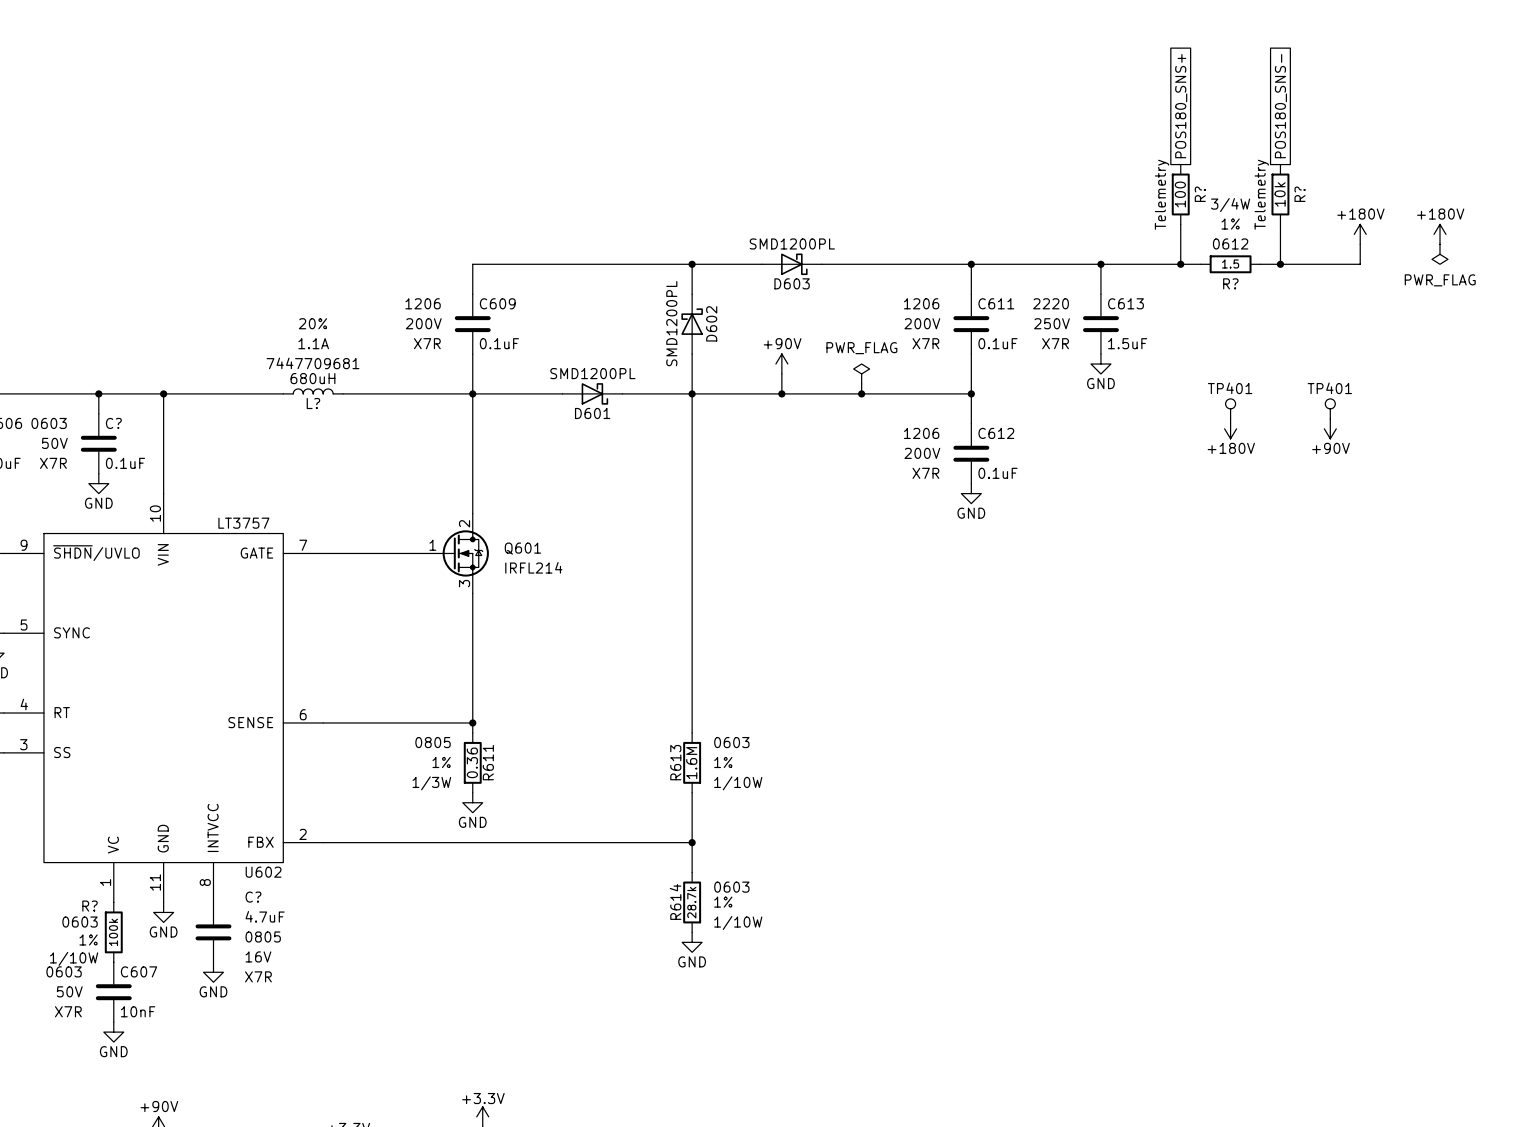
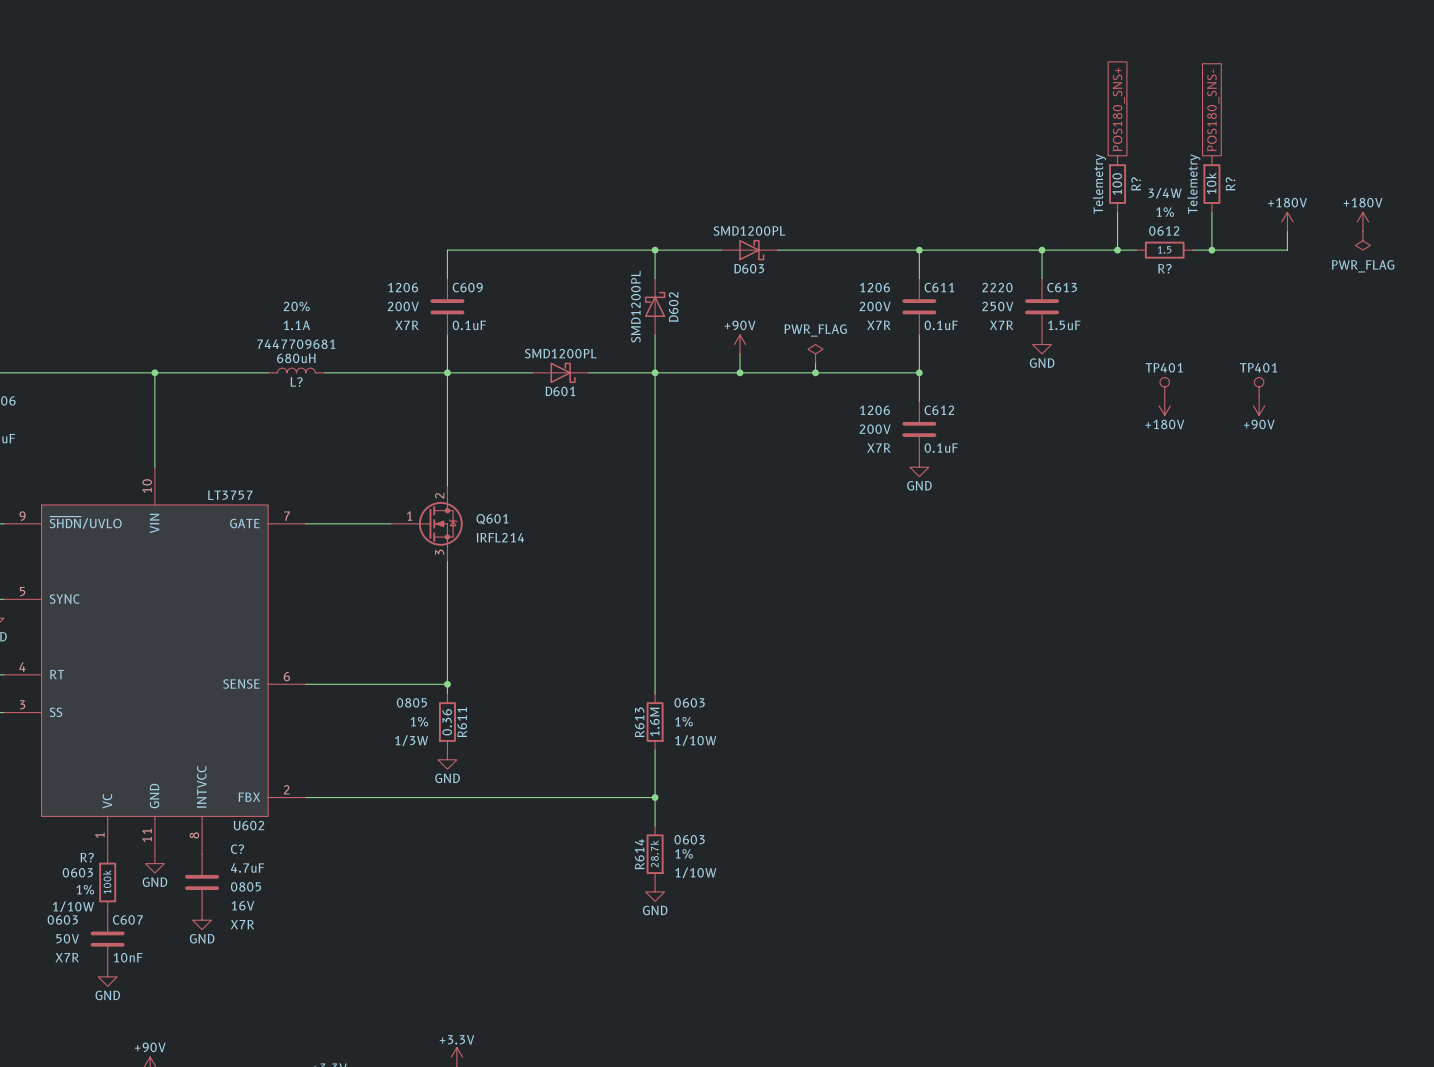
wire: (98, 393) (98, 413) -> none
junction: (98, 393) -> none
C?: 0.1uF (98, 443) -> none
power symbol: GND (98, 483) -> none

